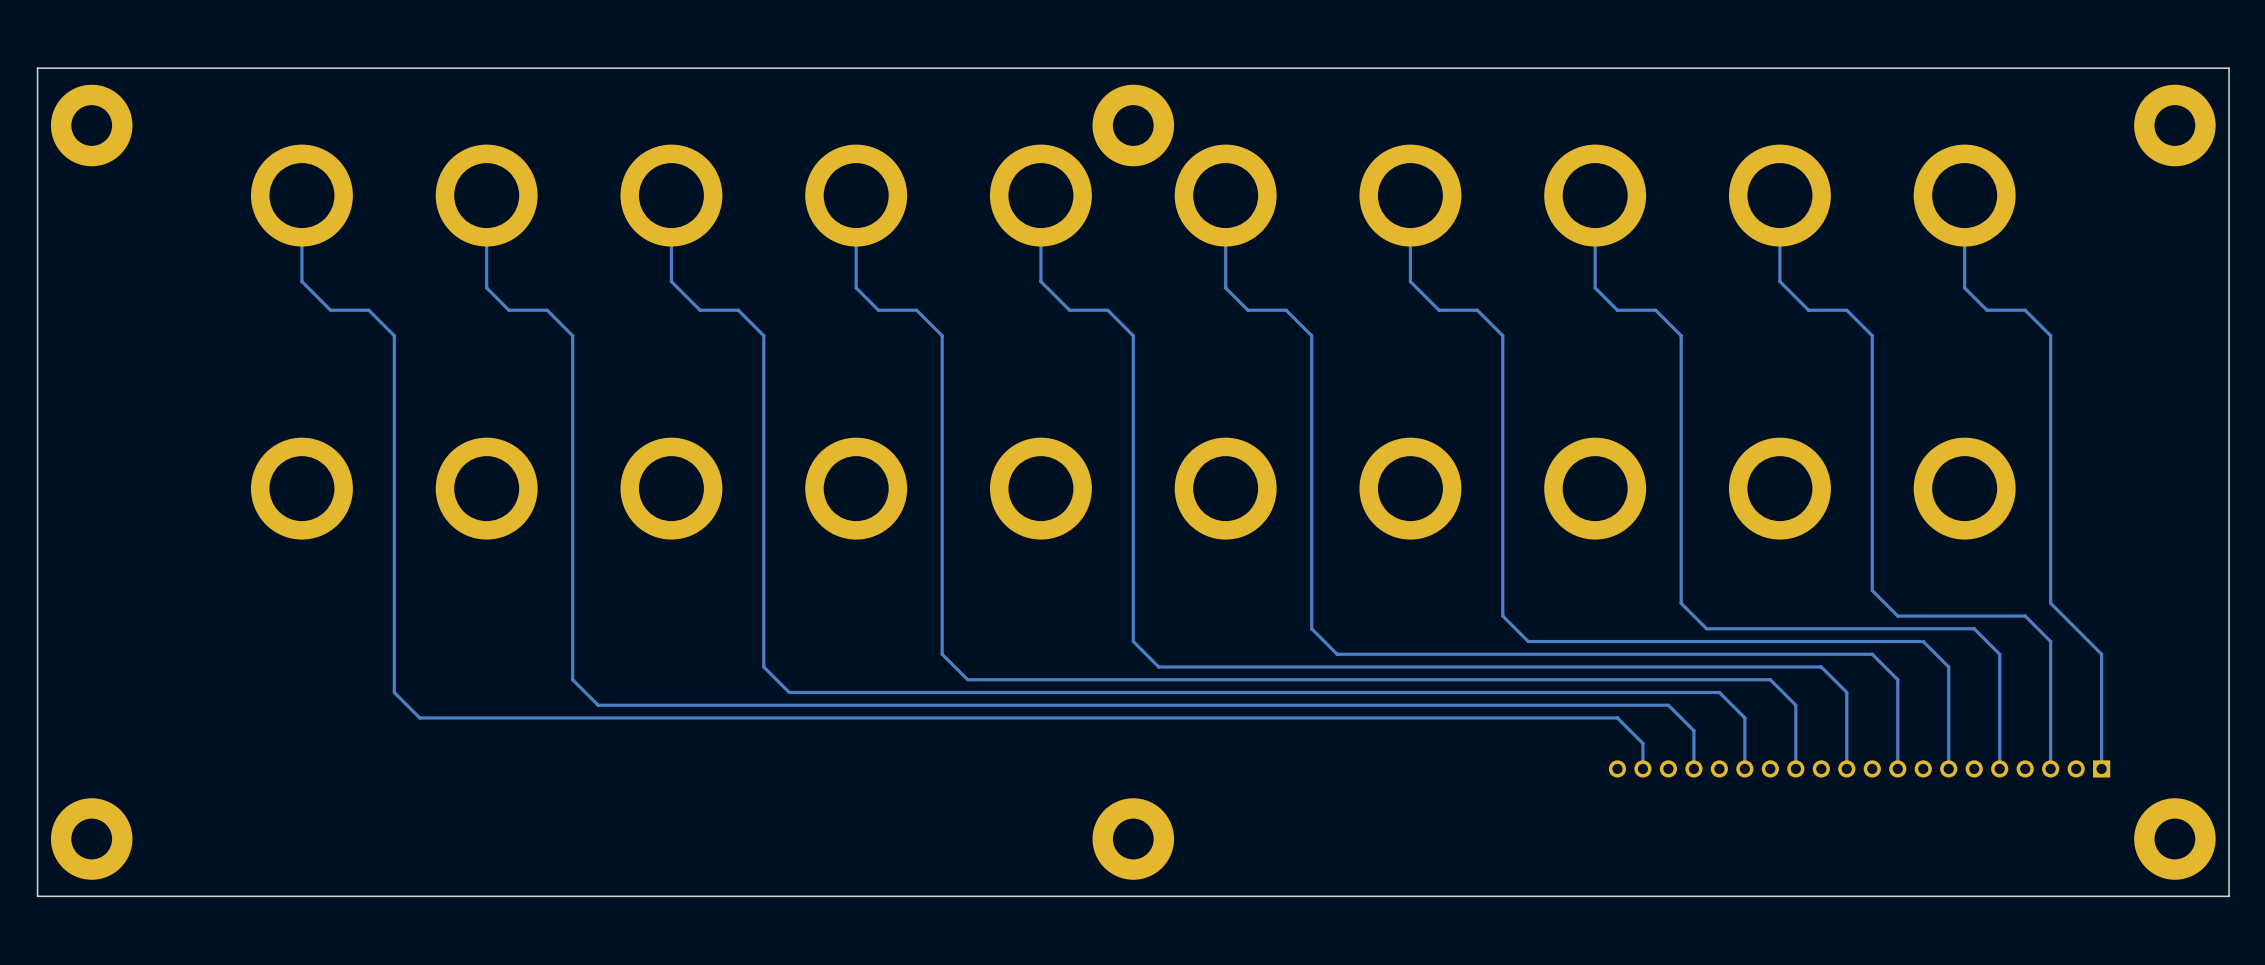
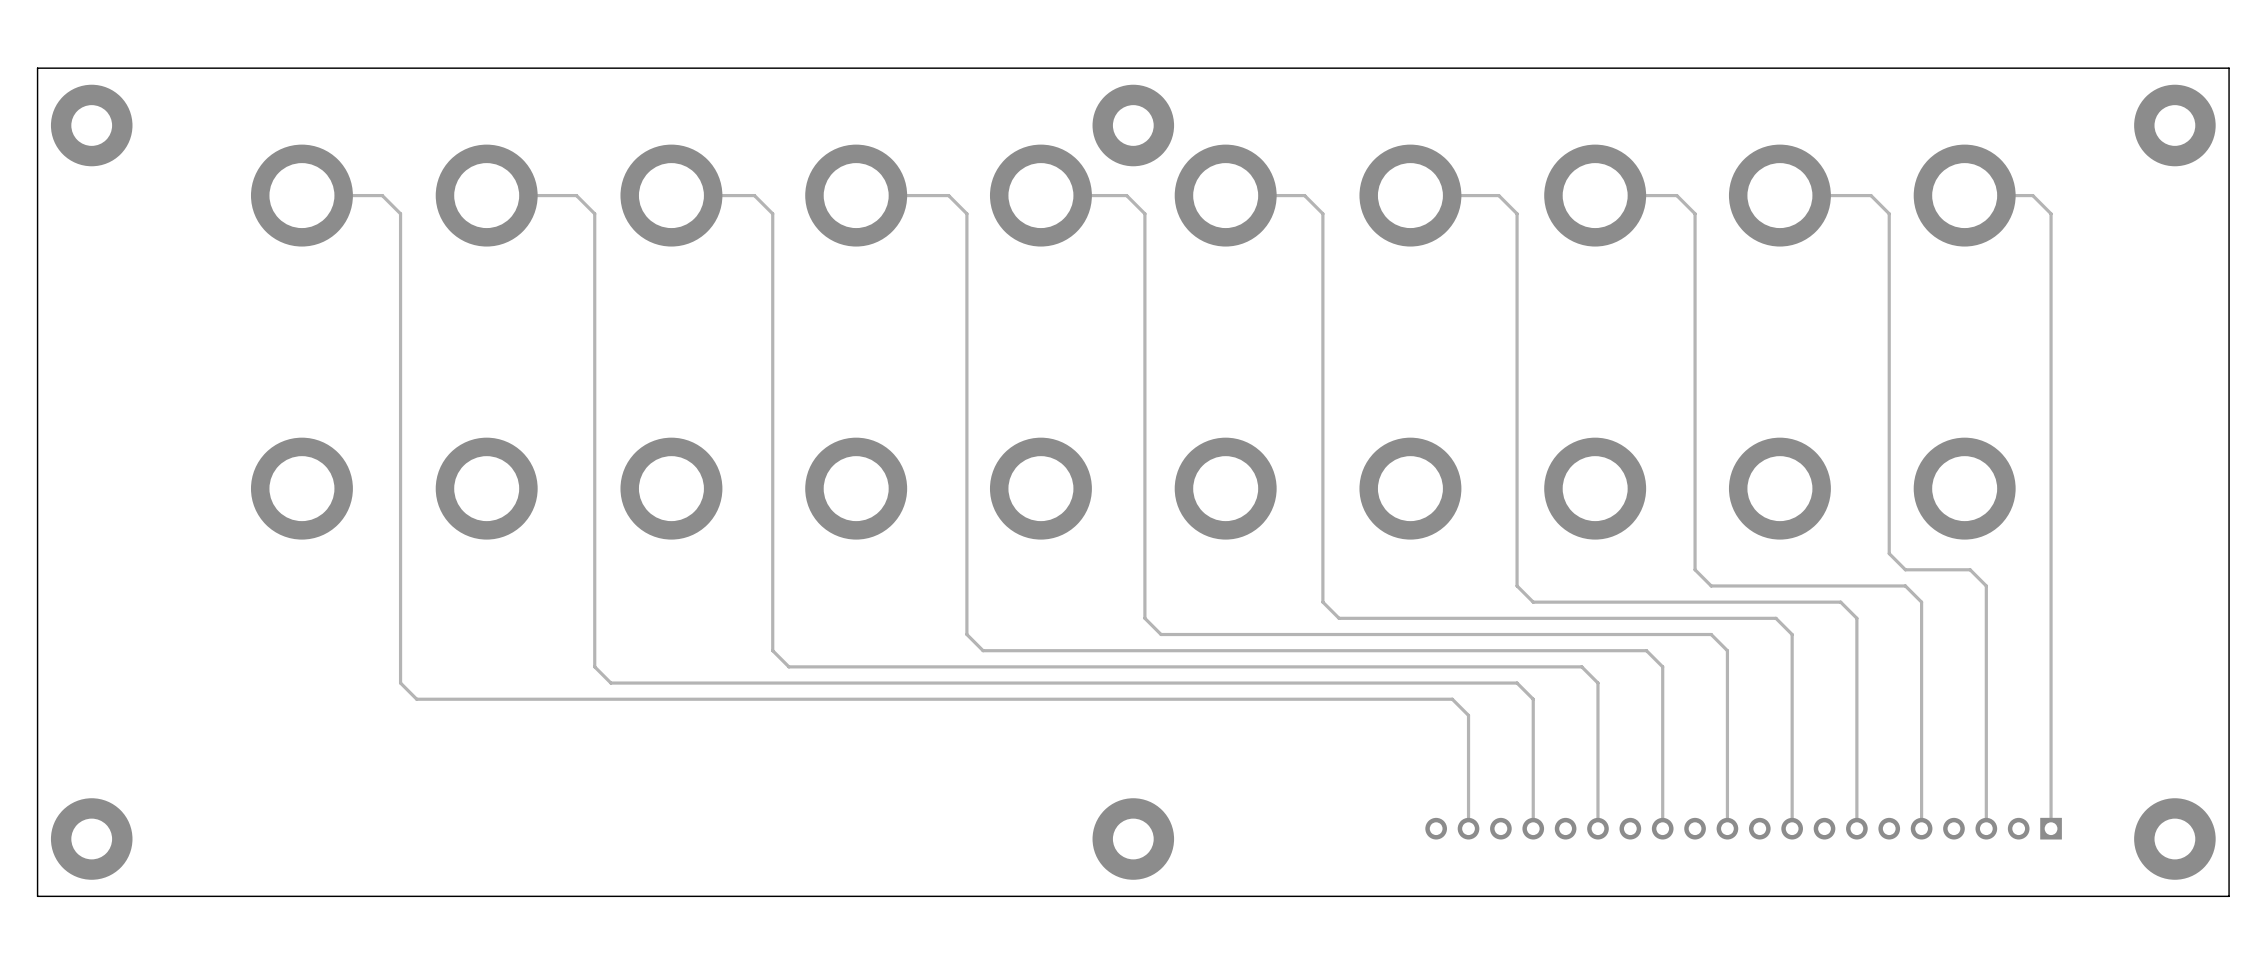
track: (301, 195) (301, 281) (330, 310) (368, 310) (394, 335) (394, 692) (419, 717) (1617, 717) (1642, 743) (1642, 768) -> (301, 195) (382, 195) (400, 213) (400, 683) (416, 699) (1452, 699) (1468, 715) (1468, 828)
track: (486, 195) (486, 287) (508, 310) (547, 310) (572, 335) (572, 679) (598, 705) (1668, 705) (1693, 730) (1693, 768) -> (486, 195) (576, 195) (594, 213) (594, 666) (610, 683) (1517, 683) (1533, 699) (1533, 828)
track: (671, 195) (671, 281) (700, 310) (738, 310) (763, 335) (763, 667) (789, 692) (1719, 692) (1744, 717) (1744, 768) -> (671, 195) (754, 195) (772, 213) (772, 650) (788, 666) (1581, 666) (1597, 683) (1597, 828)
track: (856, 195) (856, 287) (878, 310) (916, 310) (942, 335) (942, 654) (967, 679) (1770, 679) (1795, 705) (1795, 768) -> (856, 195) (948, 195) (966, 213) (966, 634) (983, 650) (1646, 650) (1662, 666) (1662, 828)
track: (1040, 195) (1040, 281) (1069, 310) (1107, 310) (1133, 335) (1133, 641) (1158, 667) (1821, 667) (1846, 692) (1846, 768) -> (1040, 195) (1126, 195) (1144, 213) (1144, 618) (1161, 634) (1711, 634) (1727, 650) (1727, 828)
track: (1225, 195) (1225, 287) (1247, 310) (1286, 310) (1311, 335) (1311, 628) (1337, 654) (1872, 654) (1897, 679) (1897, 768) -> (1225, 195) (1304, 195) (1322, 213) (1322, 602) (1339, 618) (1775, 618) (1792, 634) (1792, 828)
track: (1410, 195) (1410, 281) (1439, 310) (1477, 310) (1502, 335) (1502, 616) (1528, 641) (1923, 641) (1948, 667) (1948, 768) -> (1410, 195) (1498, 195) (1517, 213) (1517, 585) (1533, 602) (1840, 602) (1856, 618) (1856, 828)
track: (1595, 195) (1595, 287) (1617, 310) (1655, 310) (1681, 335) (1681, 603) (1706, 628) (1974, 628) (1999, 654) (1999, 768) -> (1595, 195) (1676, 195) (1695, 213) (1695, 569) (1711, 585) (1905, 585) (1921, 602) (1921, 828)
track: (1779, 195) (1779, 281) (1808, 310) (1846, 310) (1872, 335) (1872, 590) (1897, 616) (2025, 616) (2050, 641) (2050, 768) -> (1779, 195) (1871, 195) (1889, 213) (1889, 553) (1905, 569) (1970, 569) (1986, 585) (1986, 828)
track: (1964, 195) (1964, 287) (1986, 310) (2025, 310) (2050, 335) (2050, 603) (2101, 654) (2101, 768) -> (1964, 195) (2032, 195) (2051, 213) (2051, 828)
part: (1859, 768) -> none
part: none -> (1743, 828)

